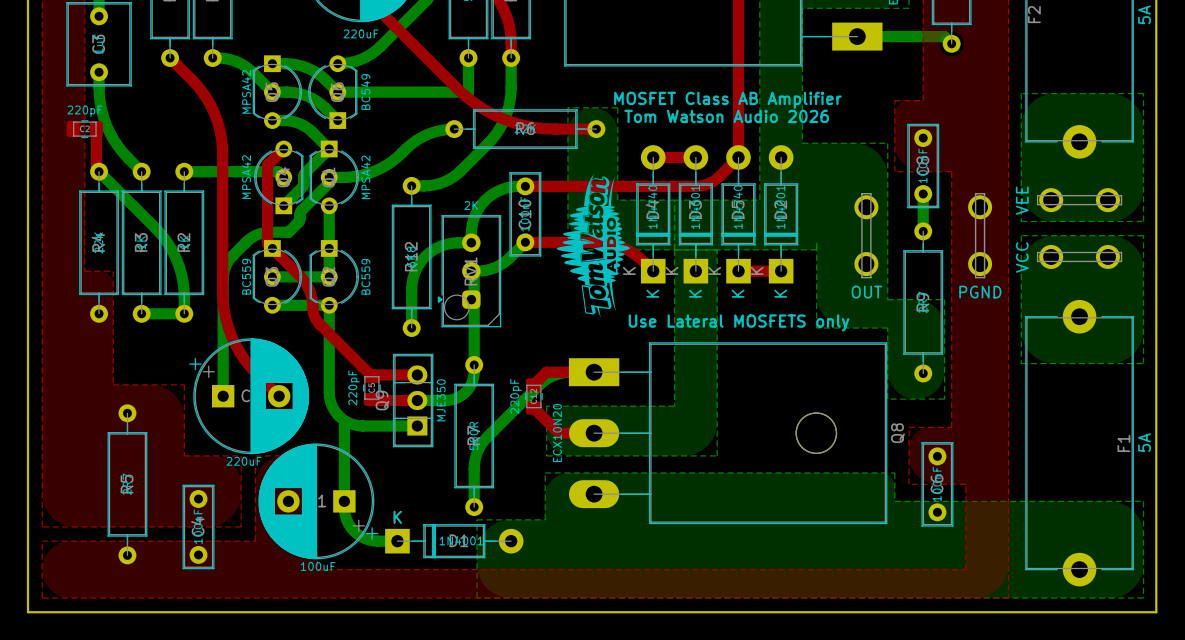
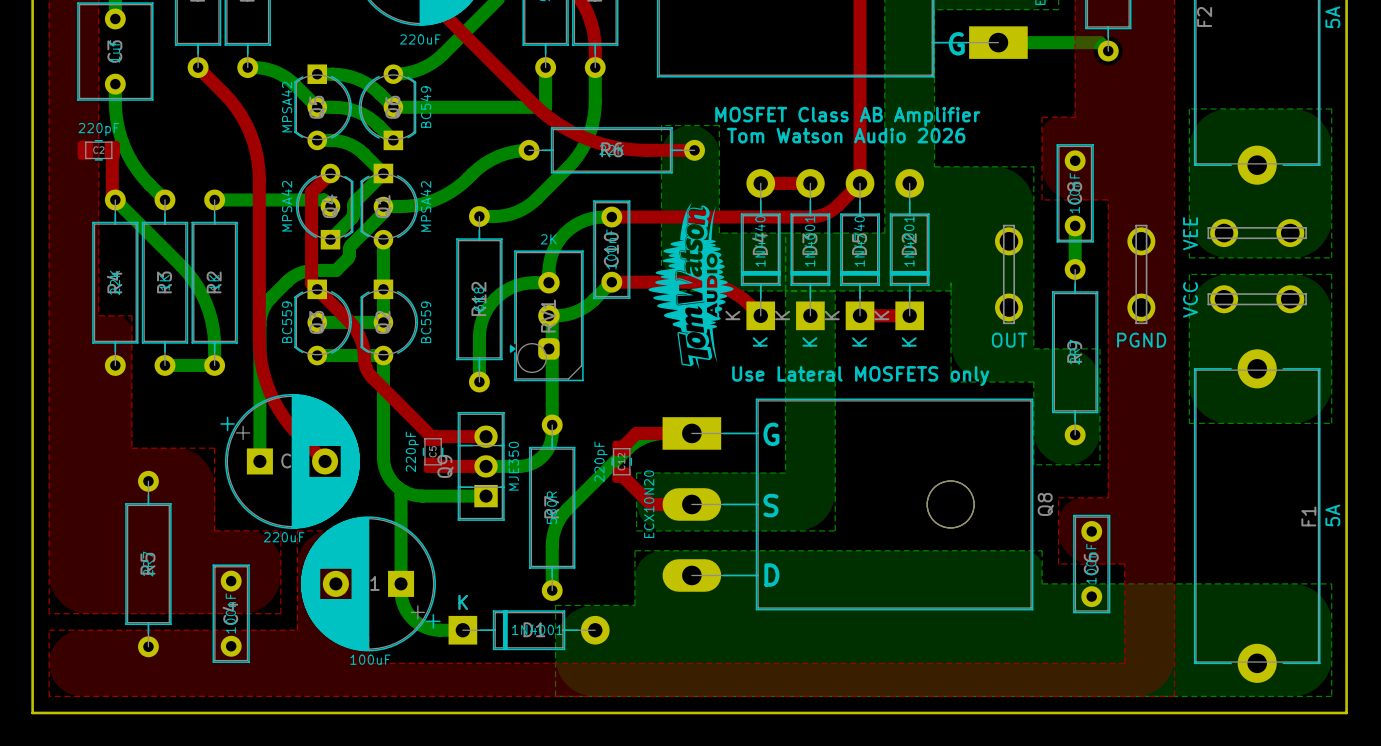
text: none -> G (956, 43)
text: none -> G (771, 434)
text: none -> S (770, 505)
text: none -> D (771, 575)

